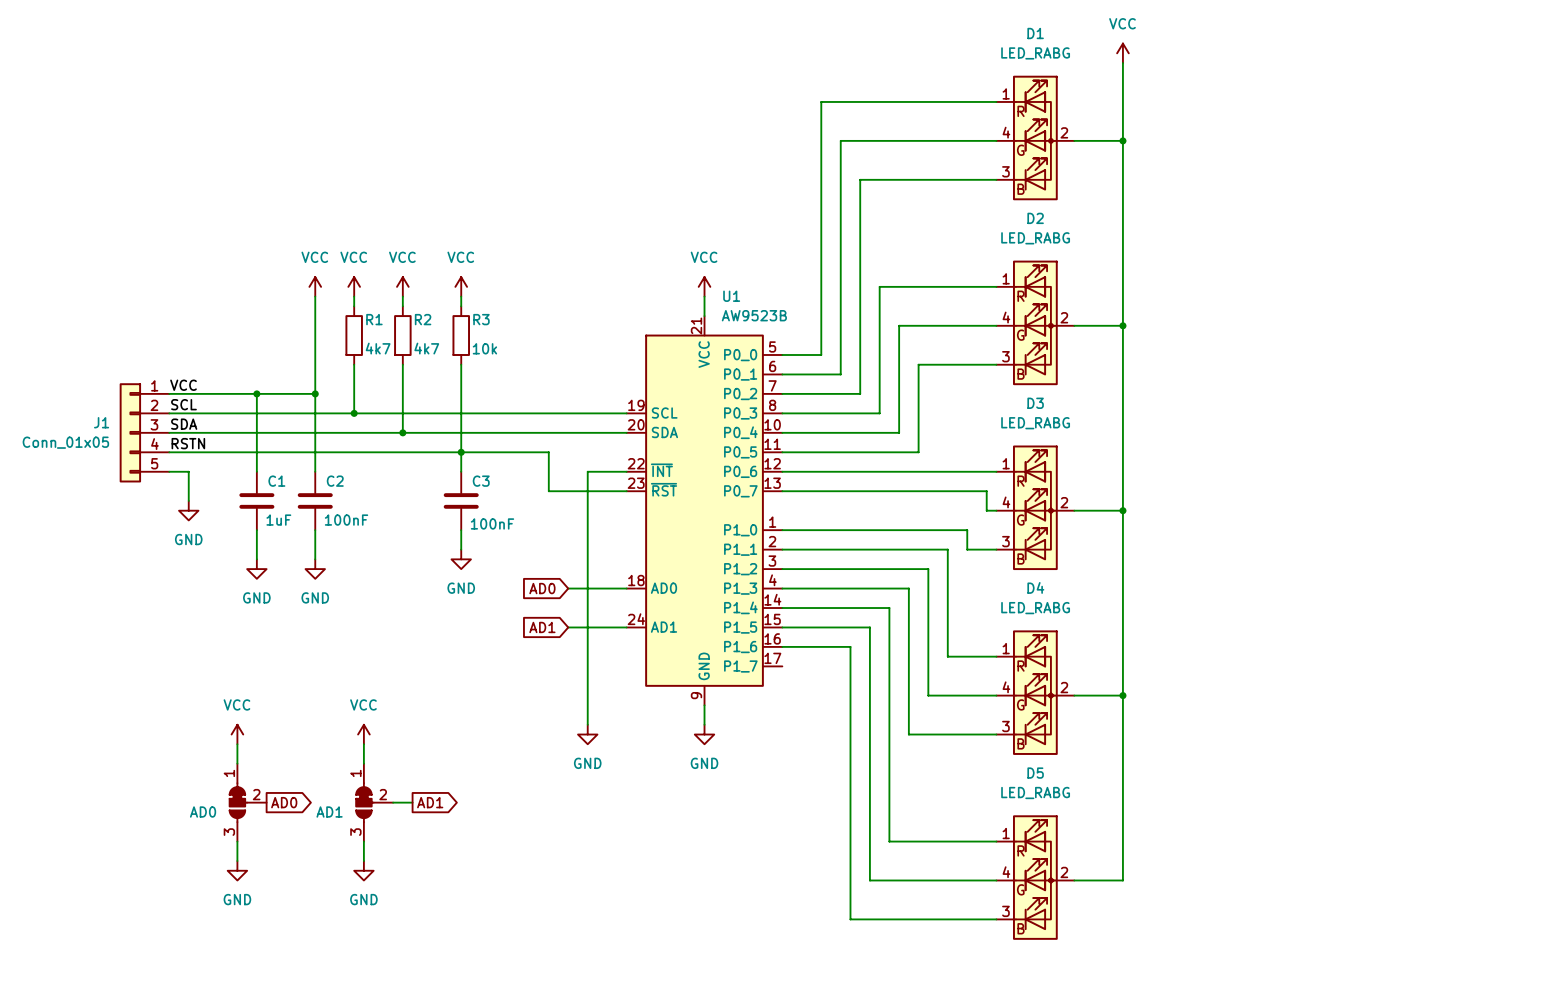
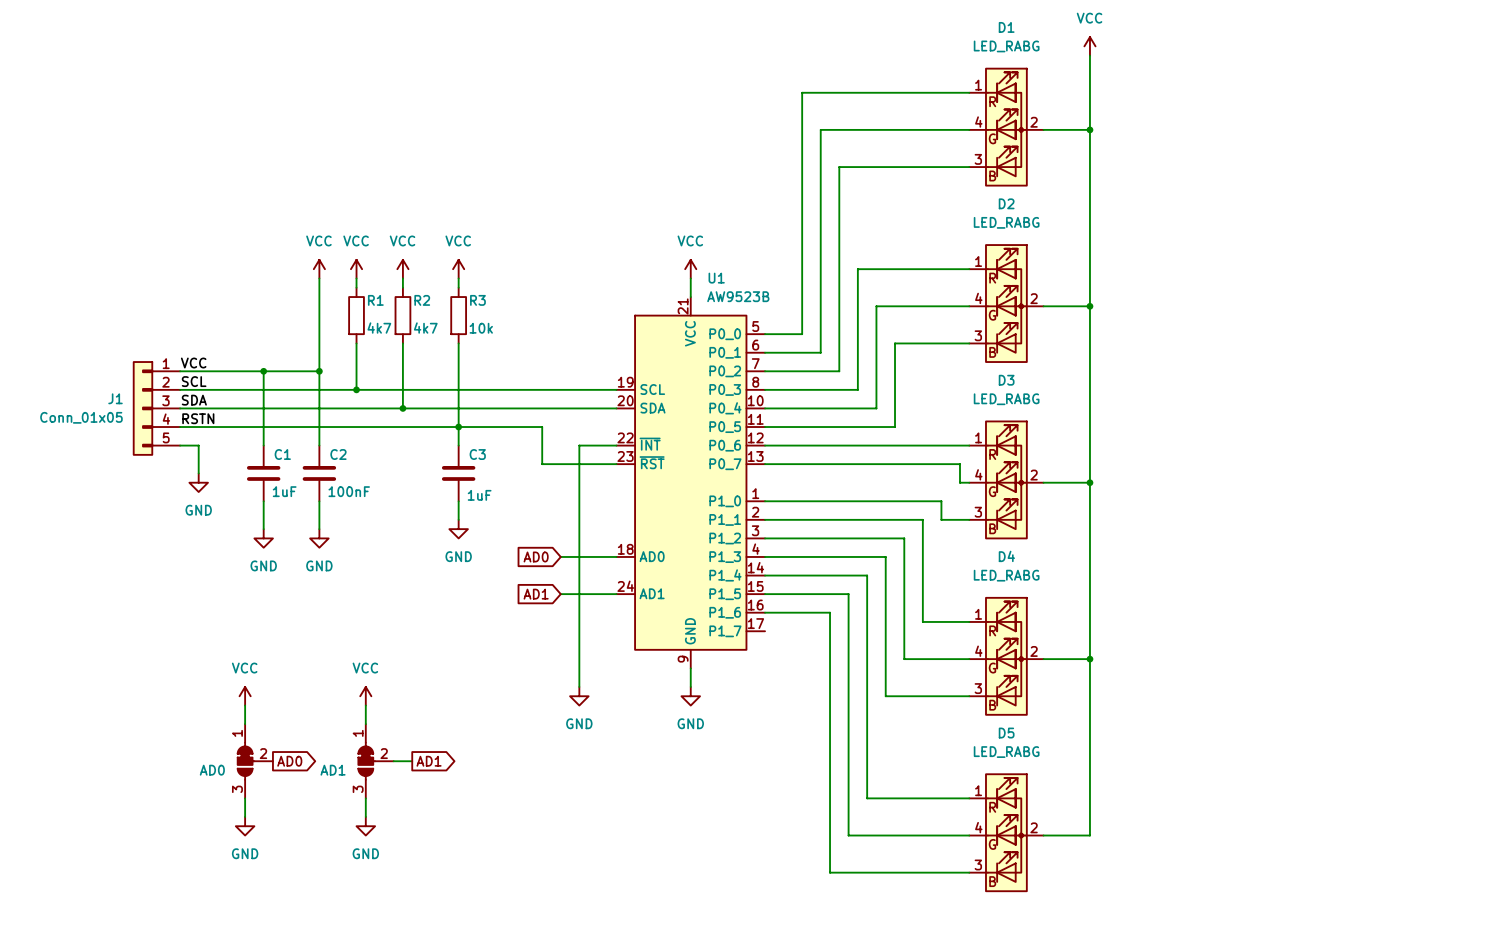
C3 value: 100nF (492, 523) -> 1uF (479, 495)

